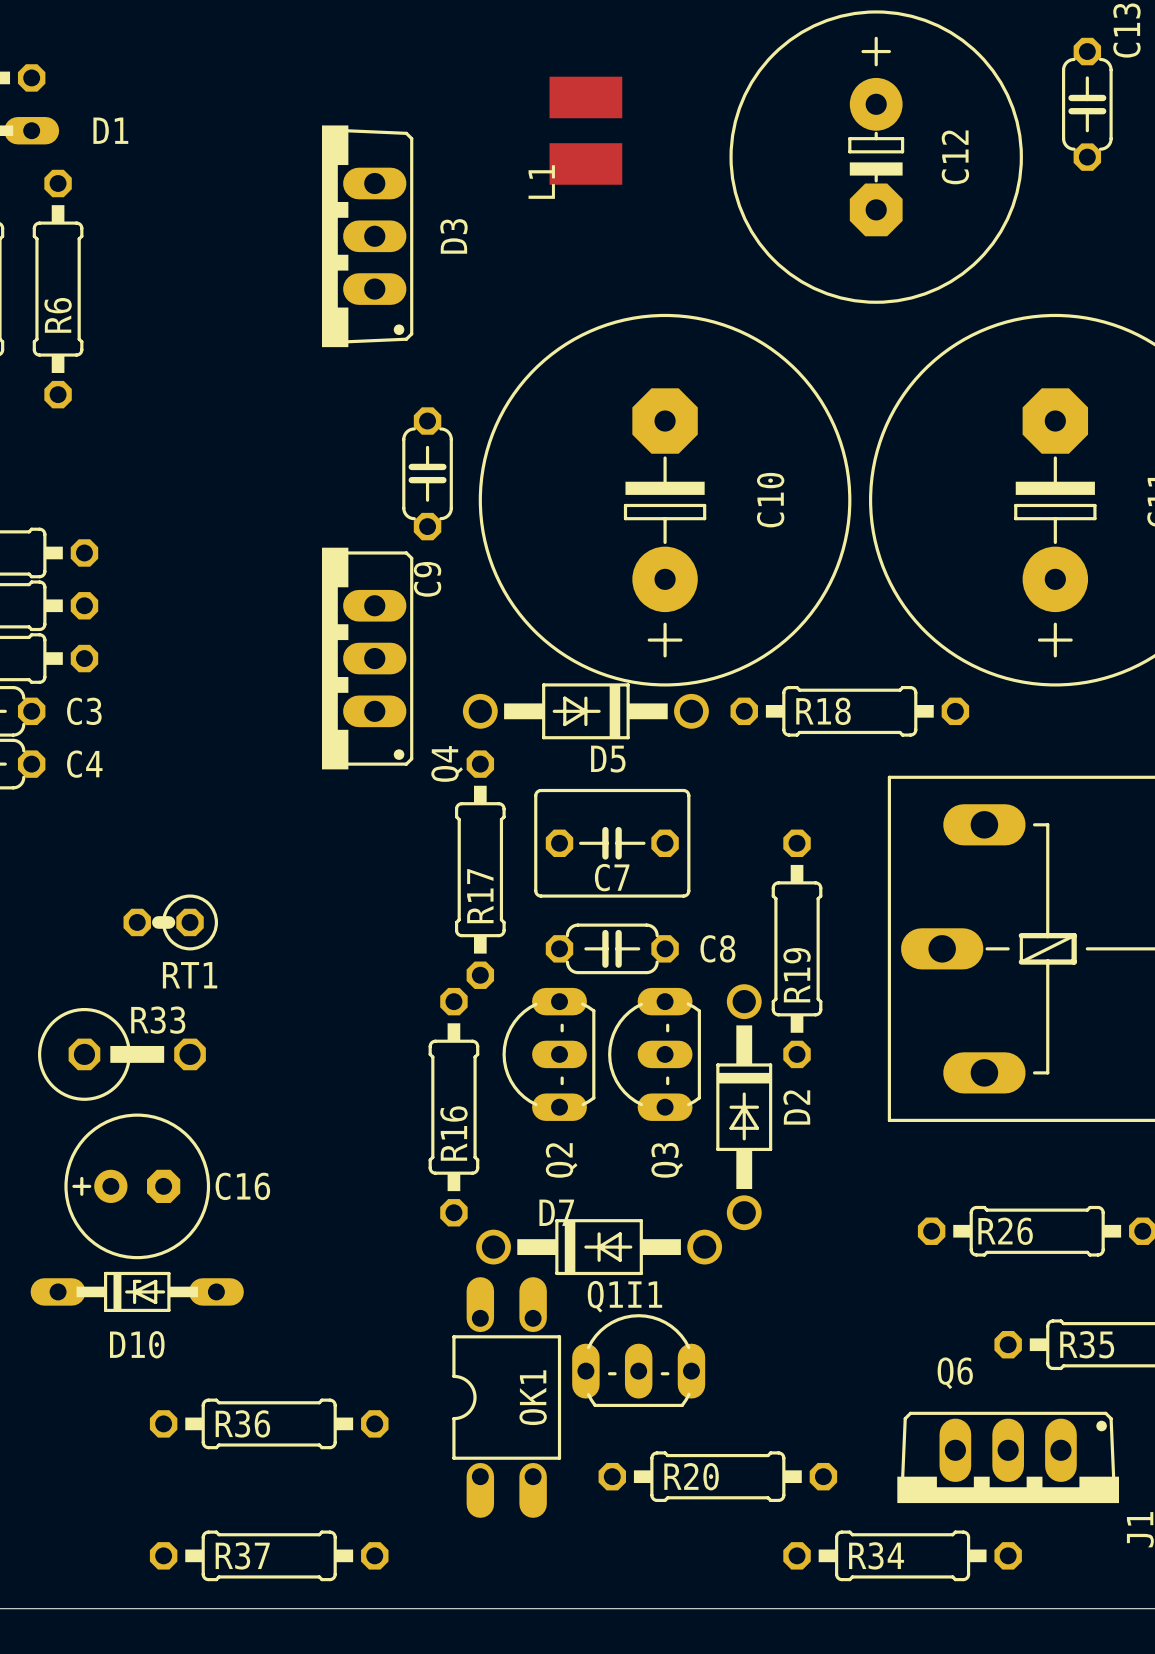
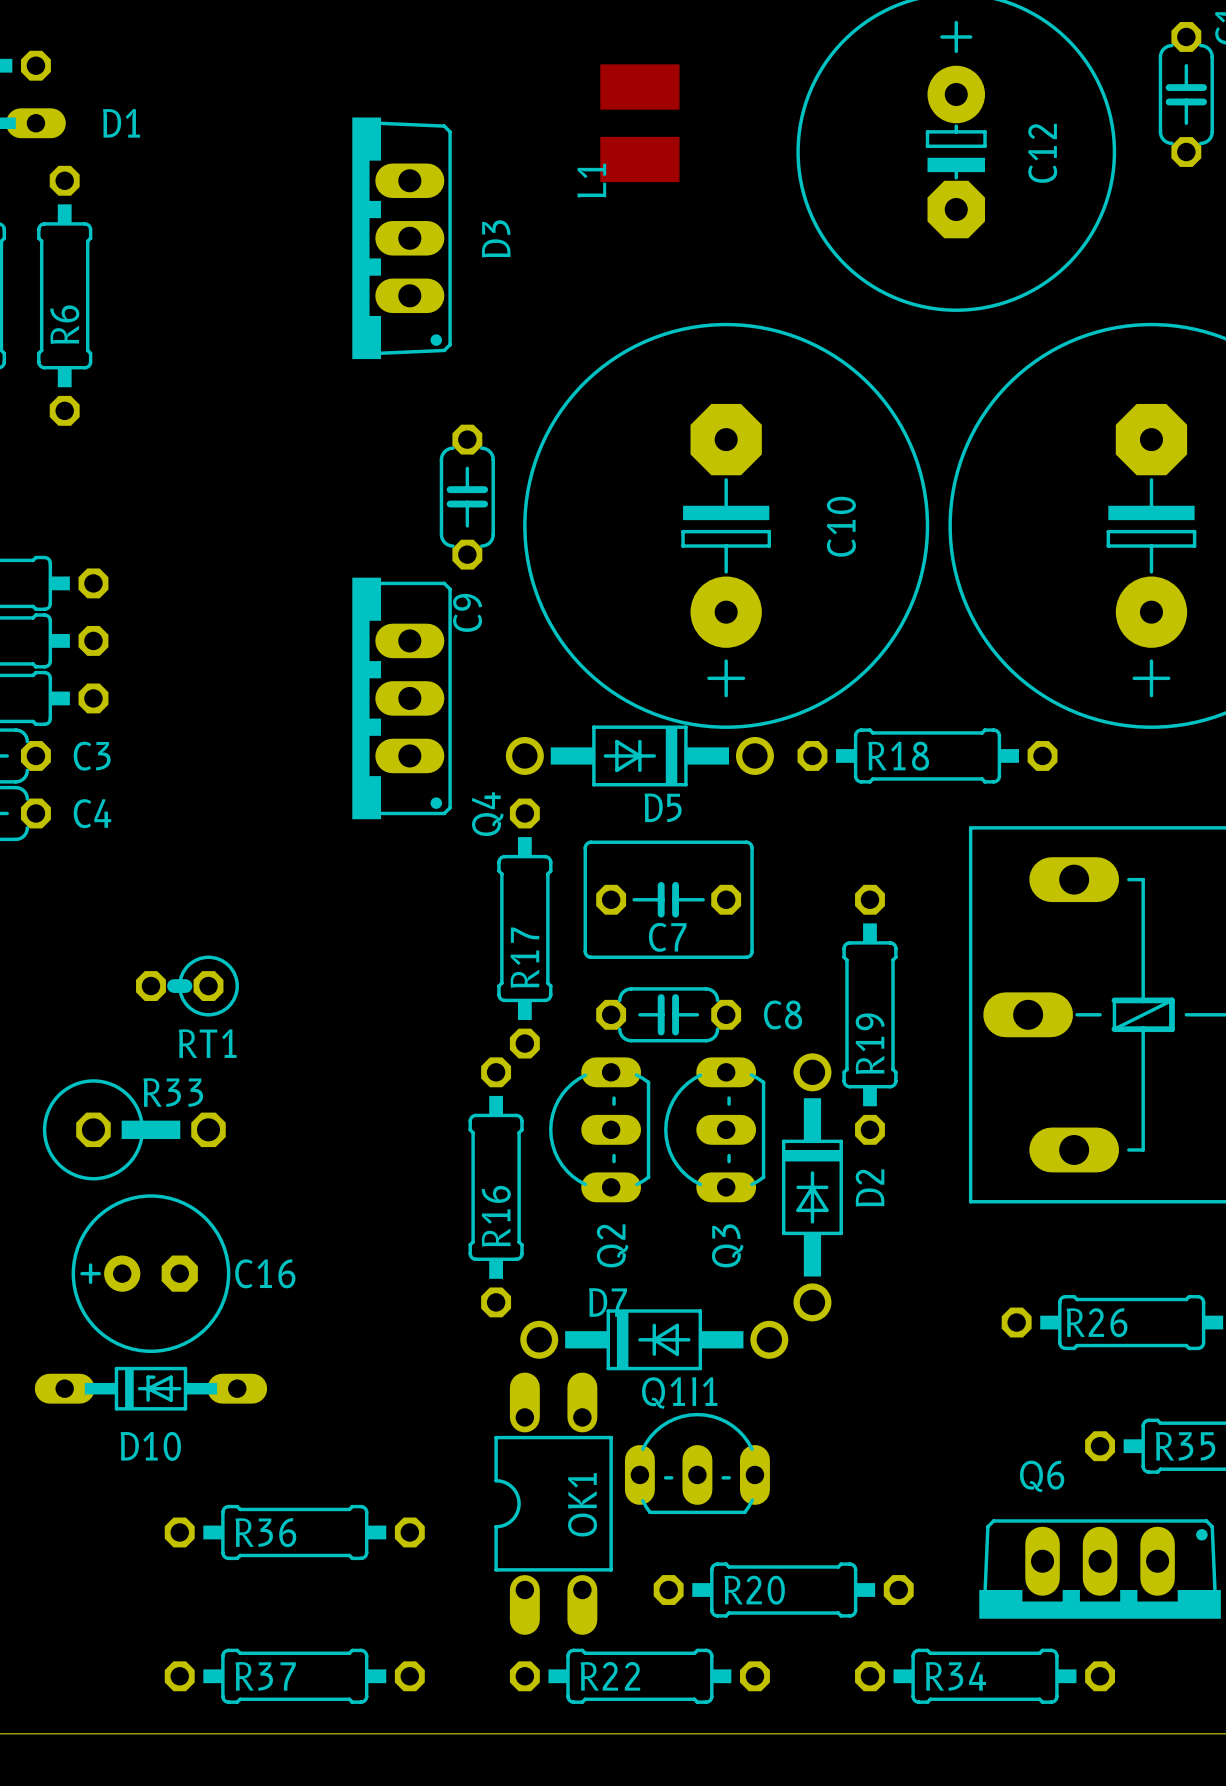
R22: none -> (639, 1676)

